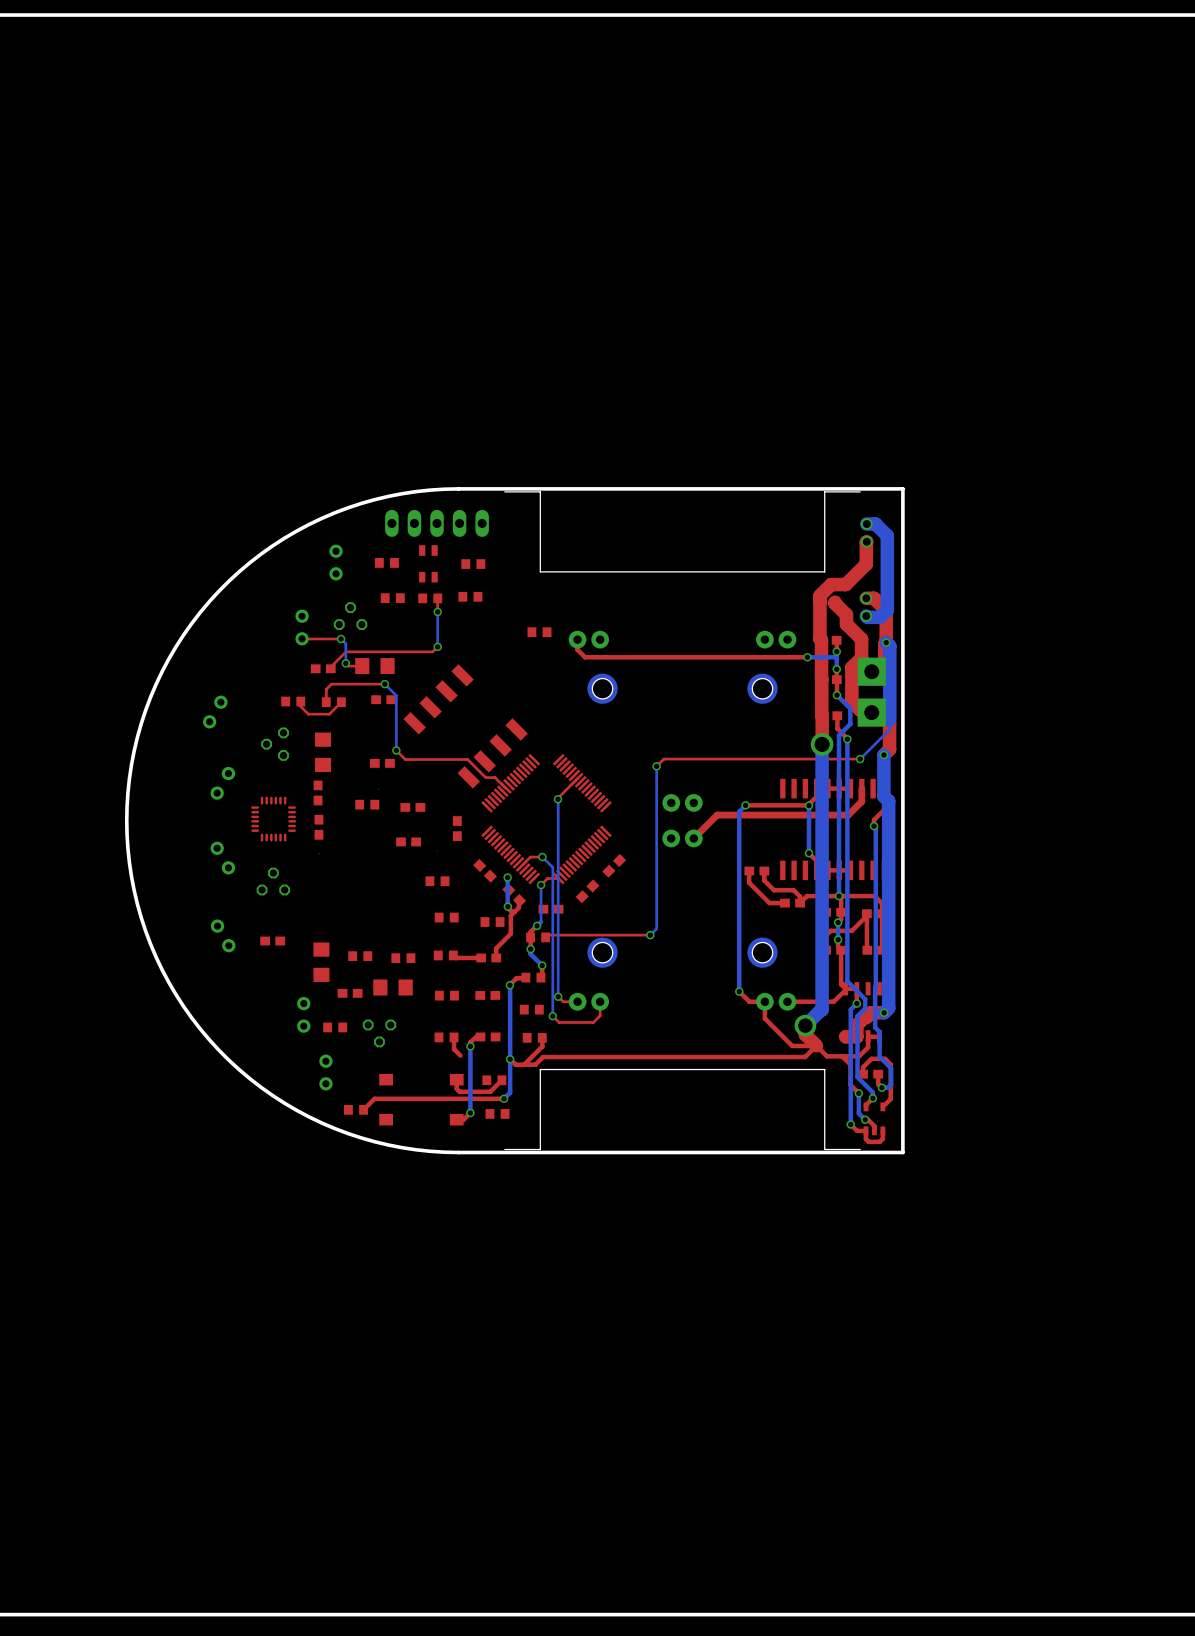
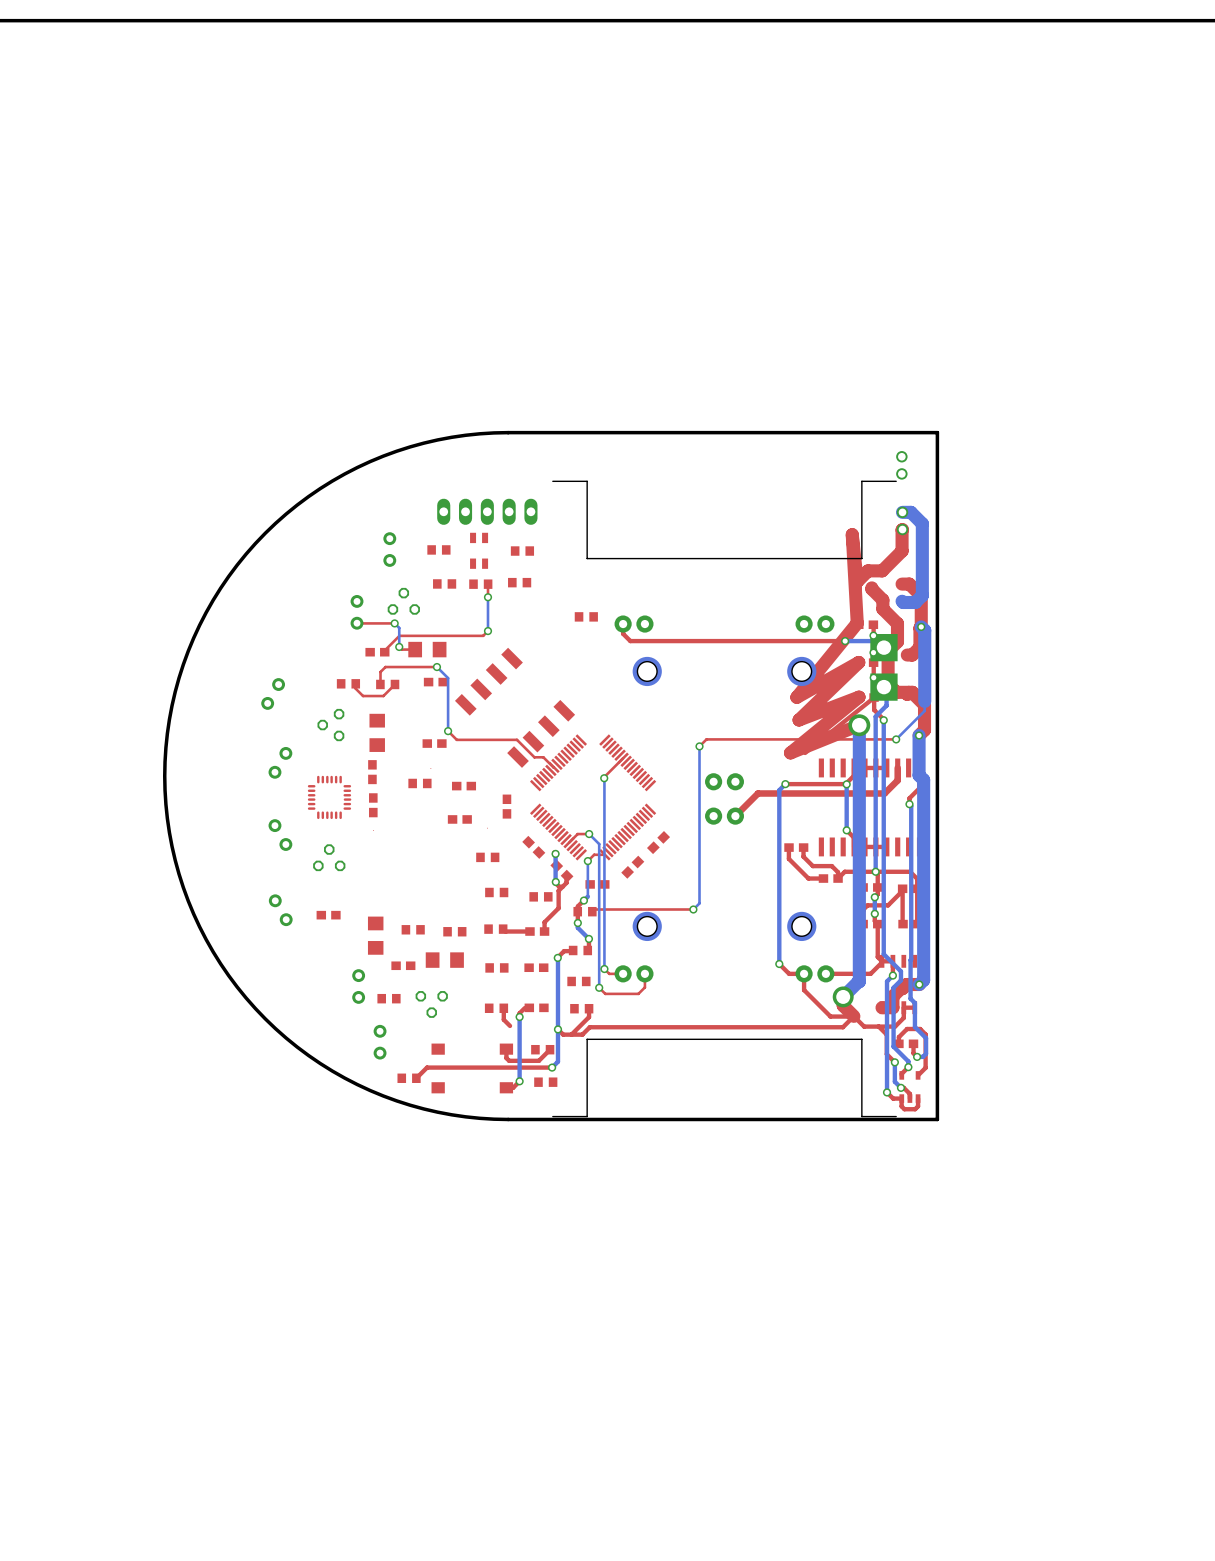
board edge: (902, 488) (458, 488) (416, 491) (388, 496) (334, 512) (309, 524) (272, 545) (250, 562) (219, 591) (183, 634) (162, 671) (145, 710) (134, 750) (127, 806) (127, 848) (134, 890) (145, 931) (162, 970) (183, 1006) (209, 1039) (250, 1078) (284, 1103) (321, 1123) (361, 1137) (416, 1149) (458, 1152) -> (937, 478) (937, 432) (508, 432) (451, 437) (423, 443) (383, 456) (357, 467) (320, 488) (297, 505) (265, 533) (237, 565) (220, 588) (199, 625) (179, 678) (169, 719) (165, 761) (165, 804) (175, 860) (188, 900) (206, 939) (237, 986) (265, 1018) (297, 1047) (332, 1071) (383, 1095) (423, 1108) (465, 1116) (508, 1119)
top track: (819, 595) (822, 744) -> (857, 581) (852, 534) (857, 623) (796, 697) (858, 662) (799, 720) (859, 697) (790, 752) (859, 725)
part position: (866, 607) -> (901, 465)
part position: (871, 692) -> (883, 667)
top track: none -> (874, 697) (805, 752)

